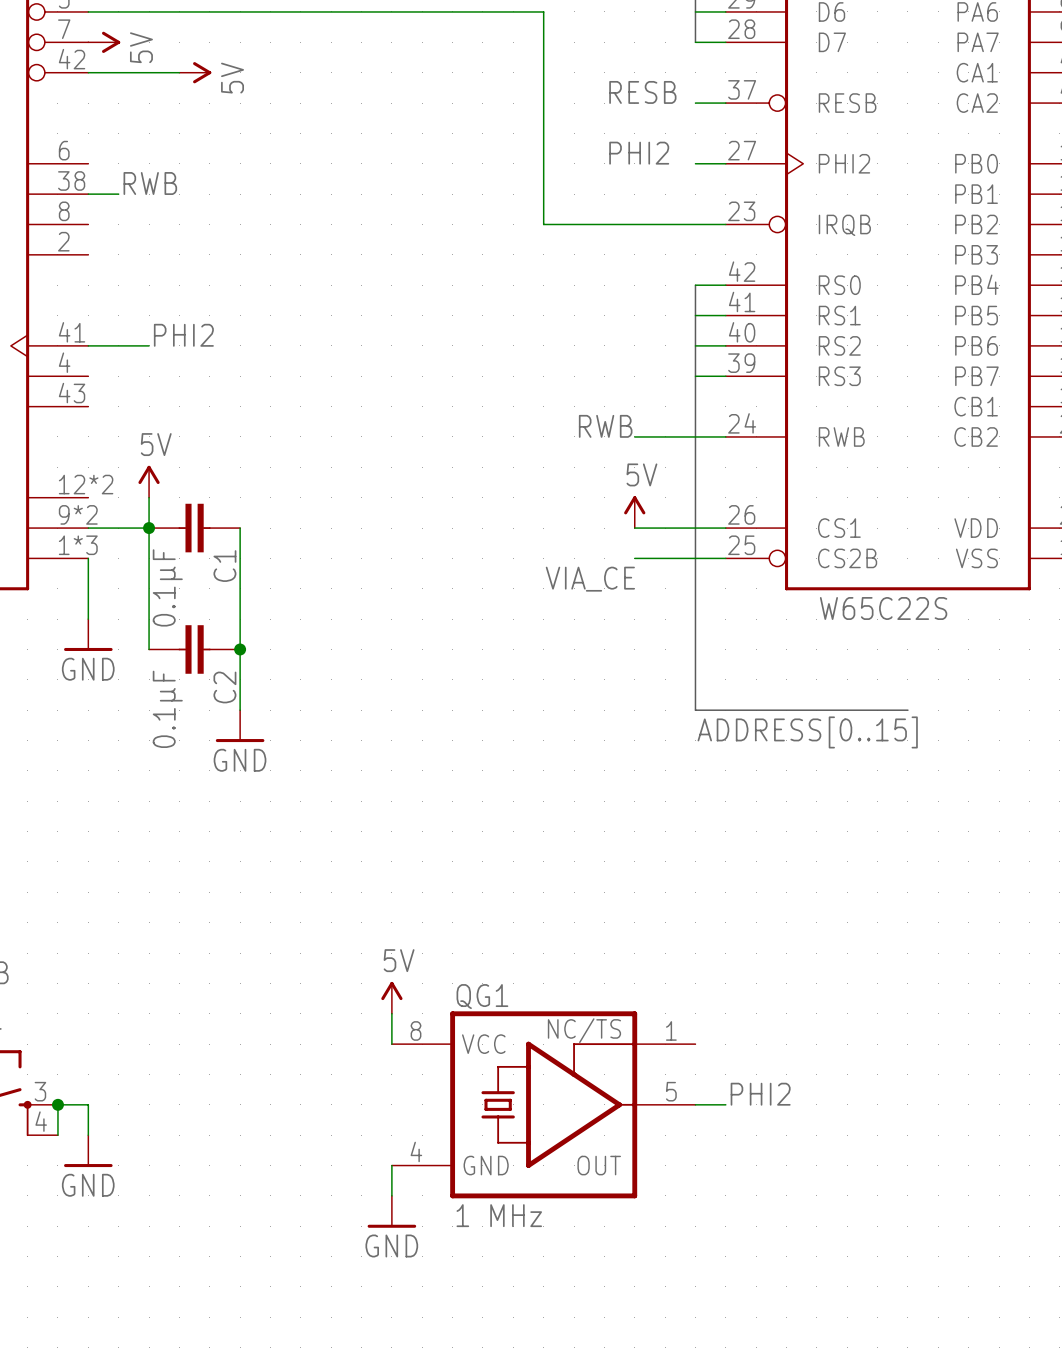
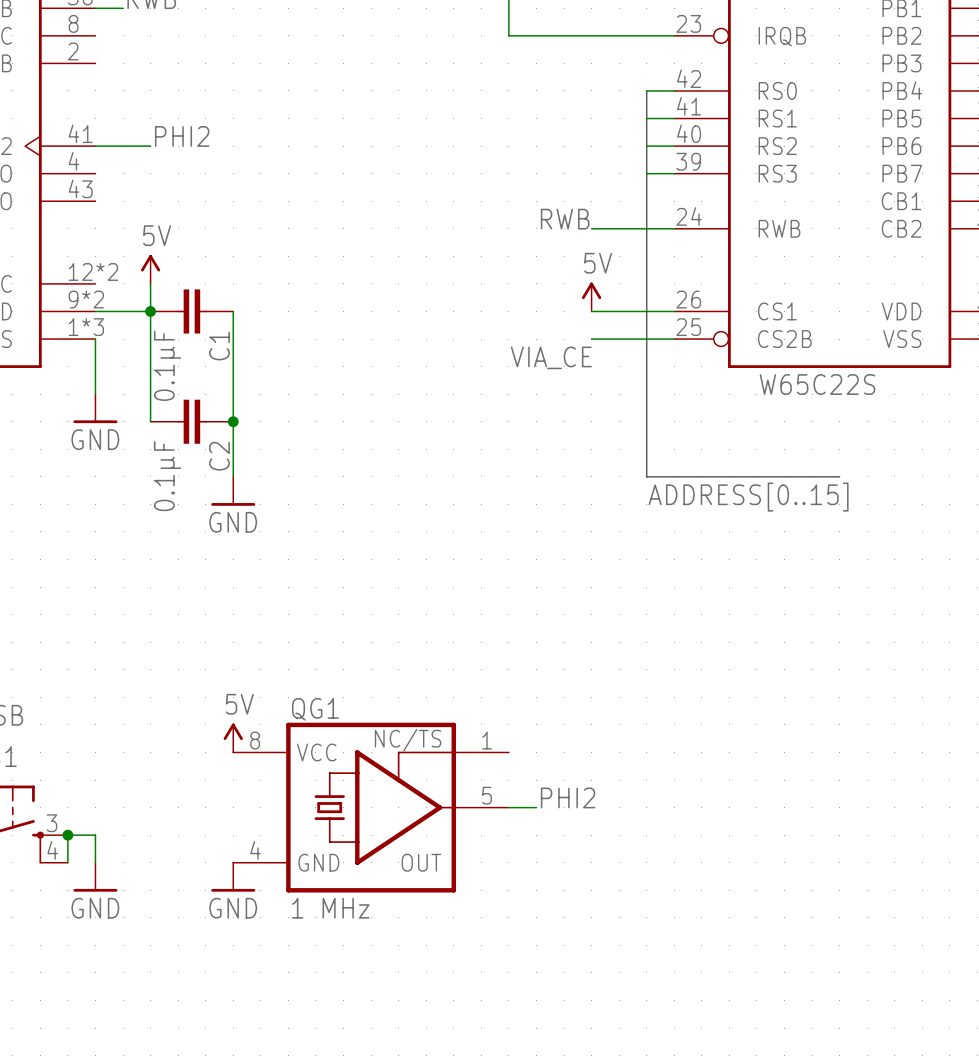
power symbol position: 5V (391, 997) -> 5V (233, 738)
wire: (391, 1013) (391, 1044) -> none
label position: PHI2 (760, 1094) -> PHI2 (568, 797)
QG1 position: (543, 1104) -> (371, 807)
wire: (695, 1104) (725, 1104) -> (508, 807) (536, 807)
wire: (391, 1165) (391, 1195) -> none
power symbol position: GND (391, 1211) -> GND (233, 877)

